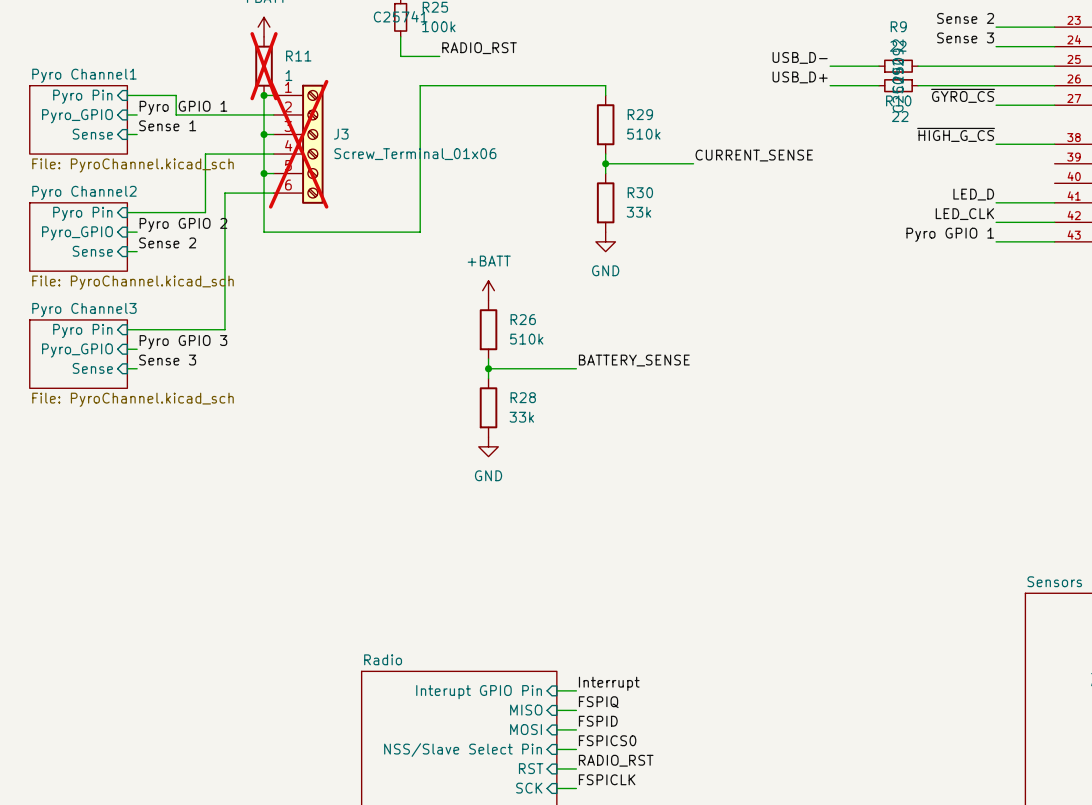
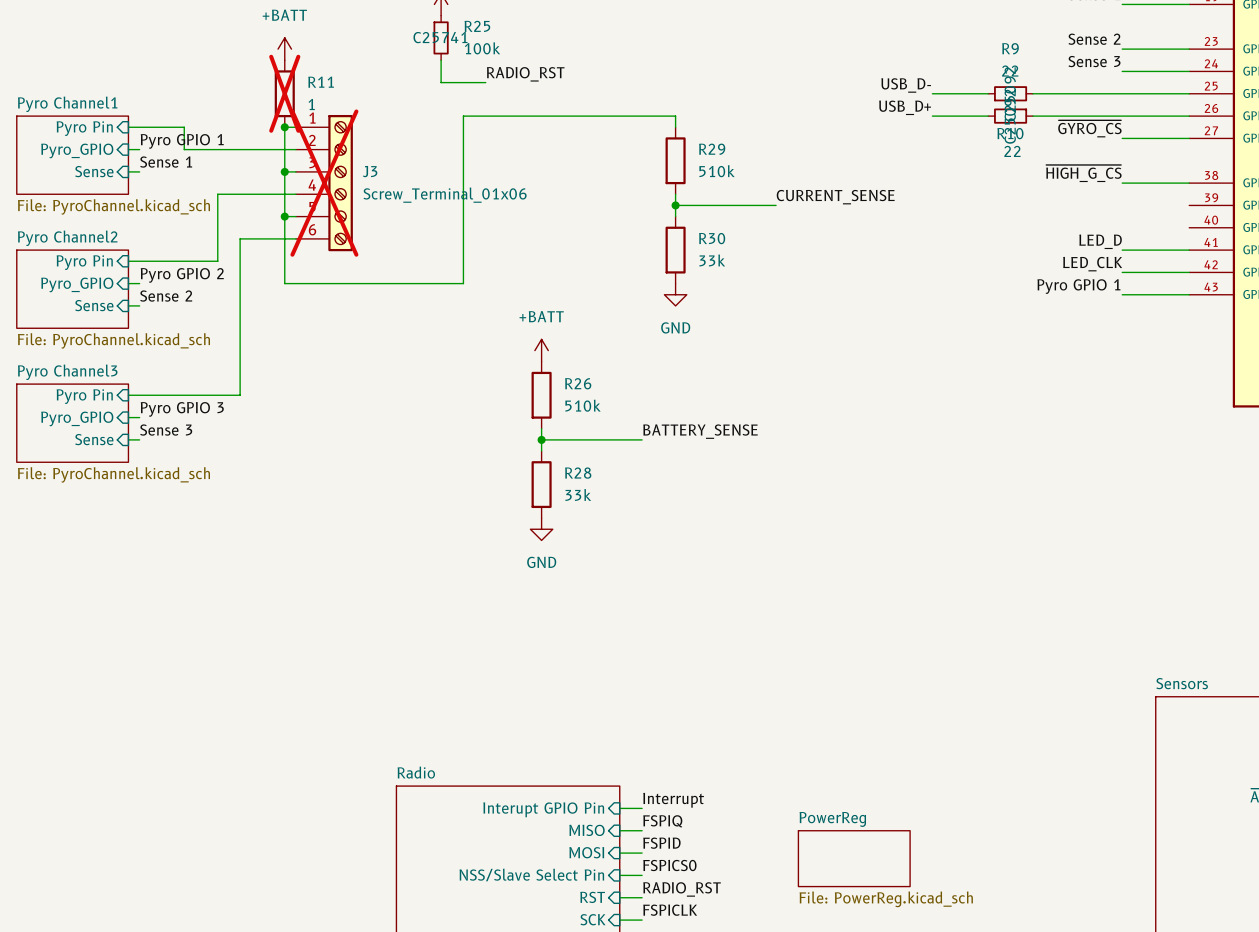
sheet PowerReg: none -> File: PowerReg.kicad_sch (854, 858)

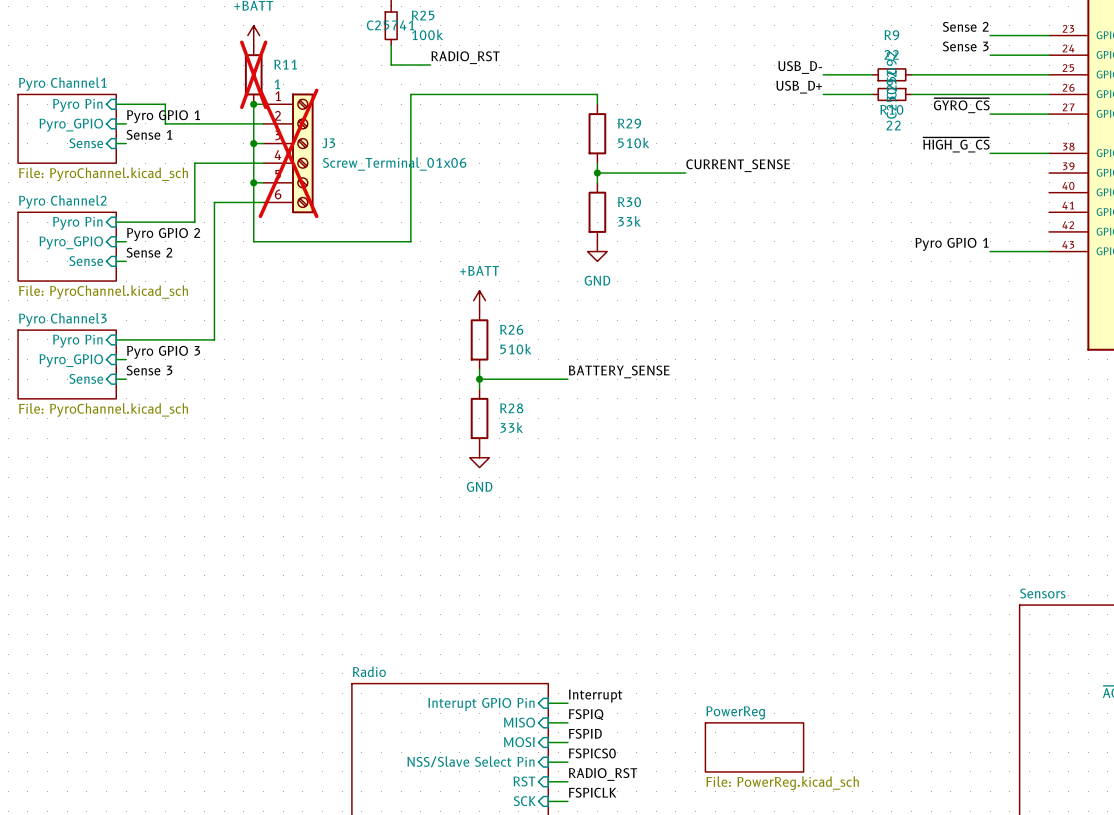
label: LED_D (1100, 241) -> none
wire: (1122, 250) (1189, 250) -> none
label: LED_CLK (1092, 264) -> none
wire: (1122, 272) (1189, 272) -> none

